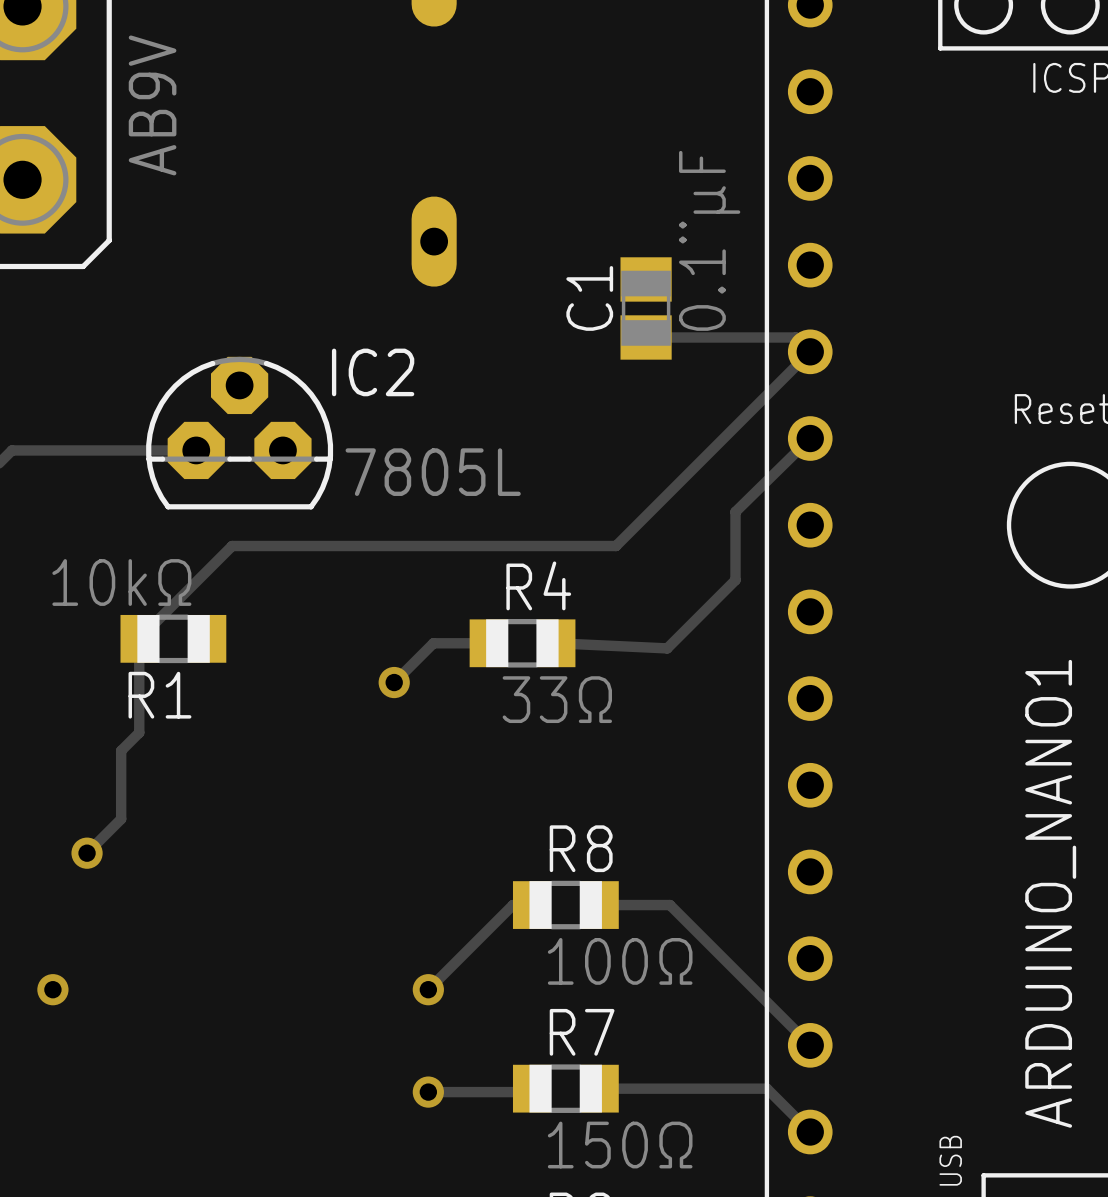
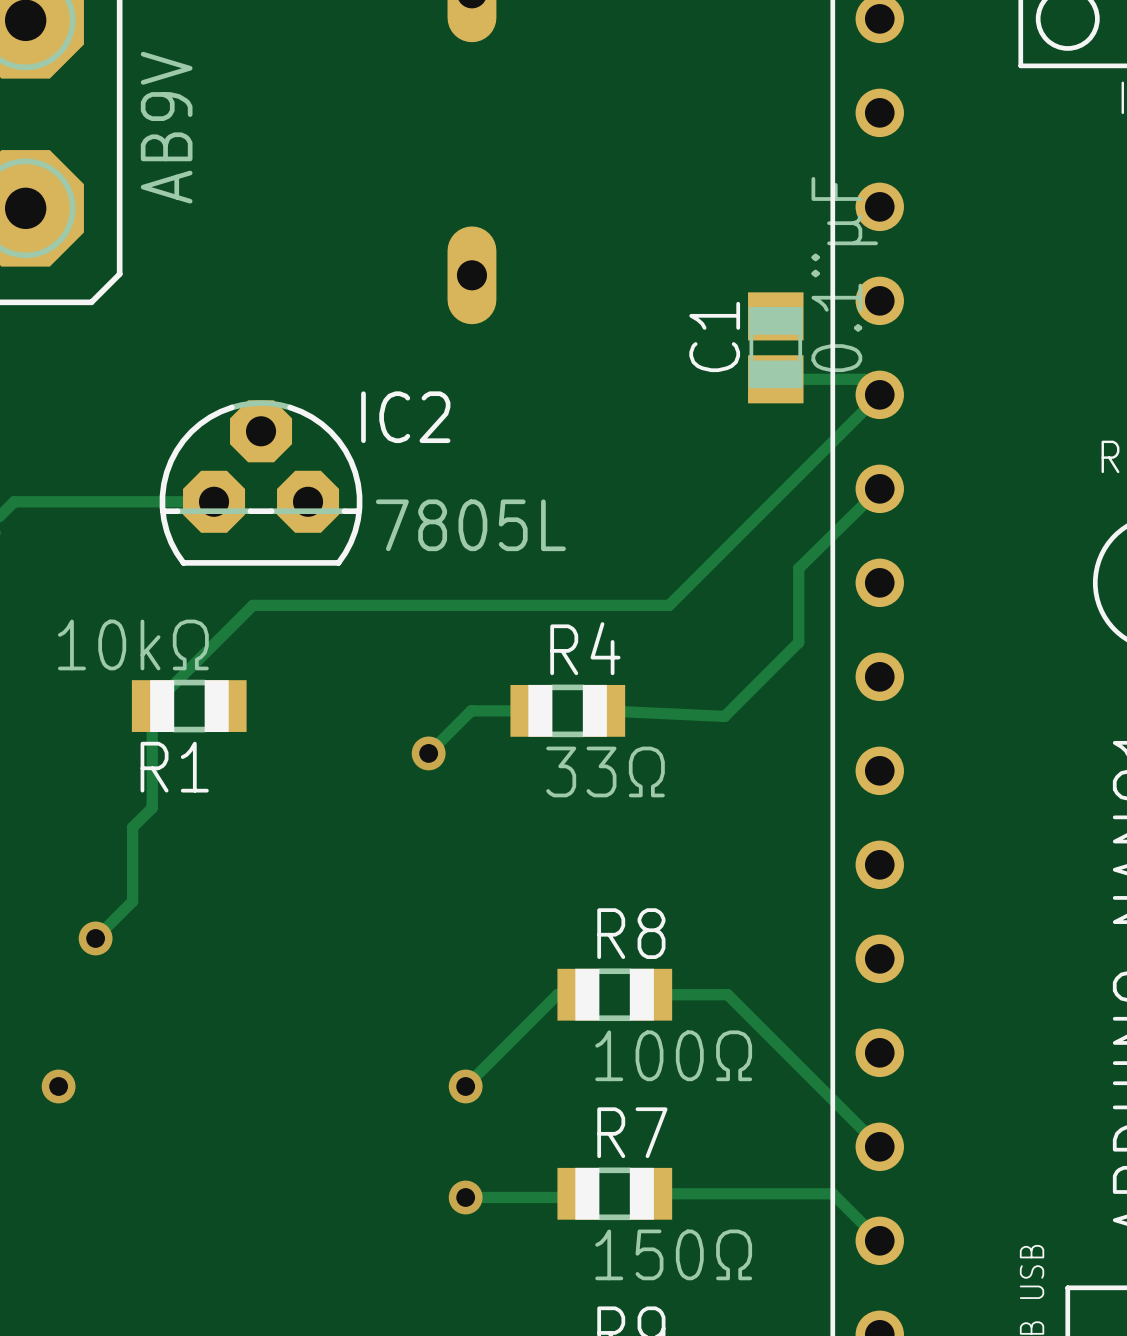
C1 position: (646, 308) -> (775, 347)
track: (646, 337) (714, 337) -> none

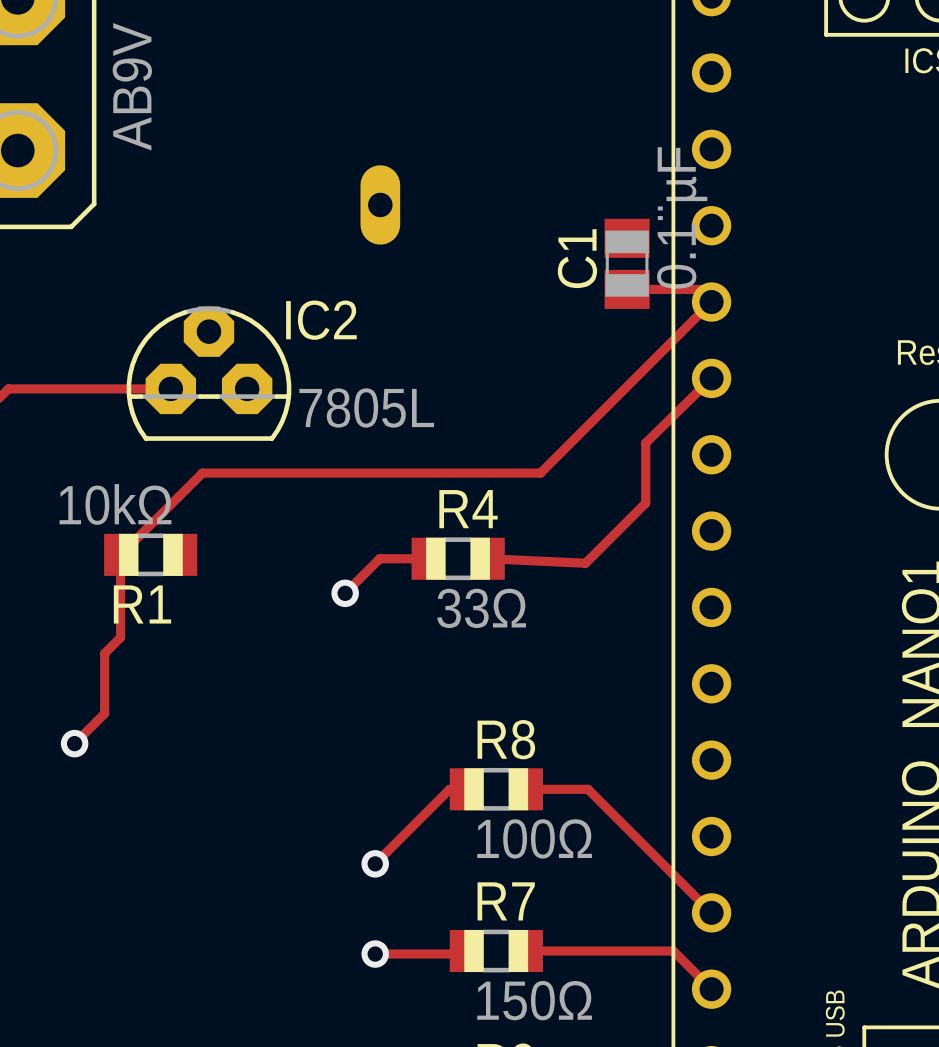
via: (58, 1086) -> none

